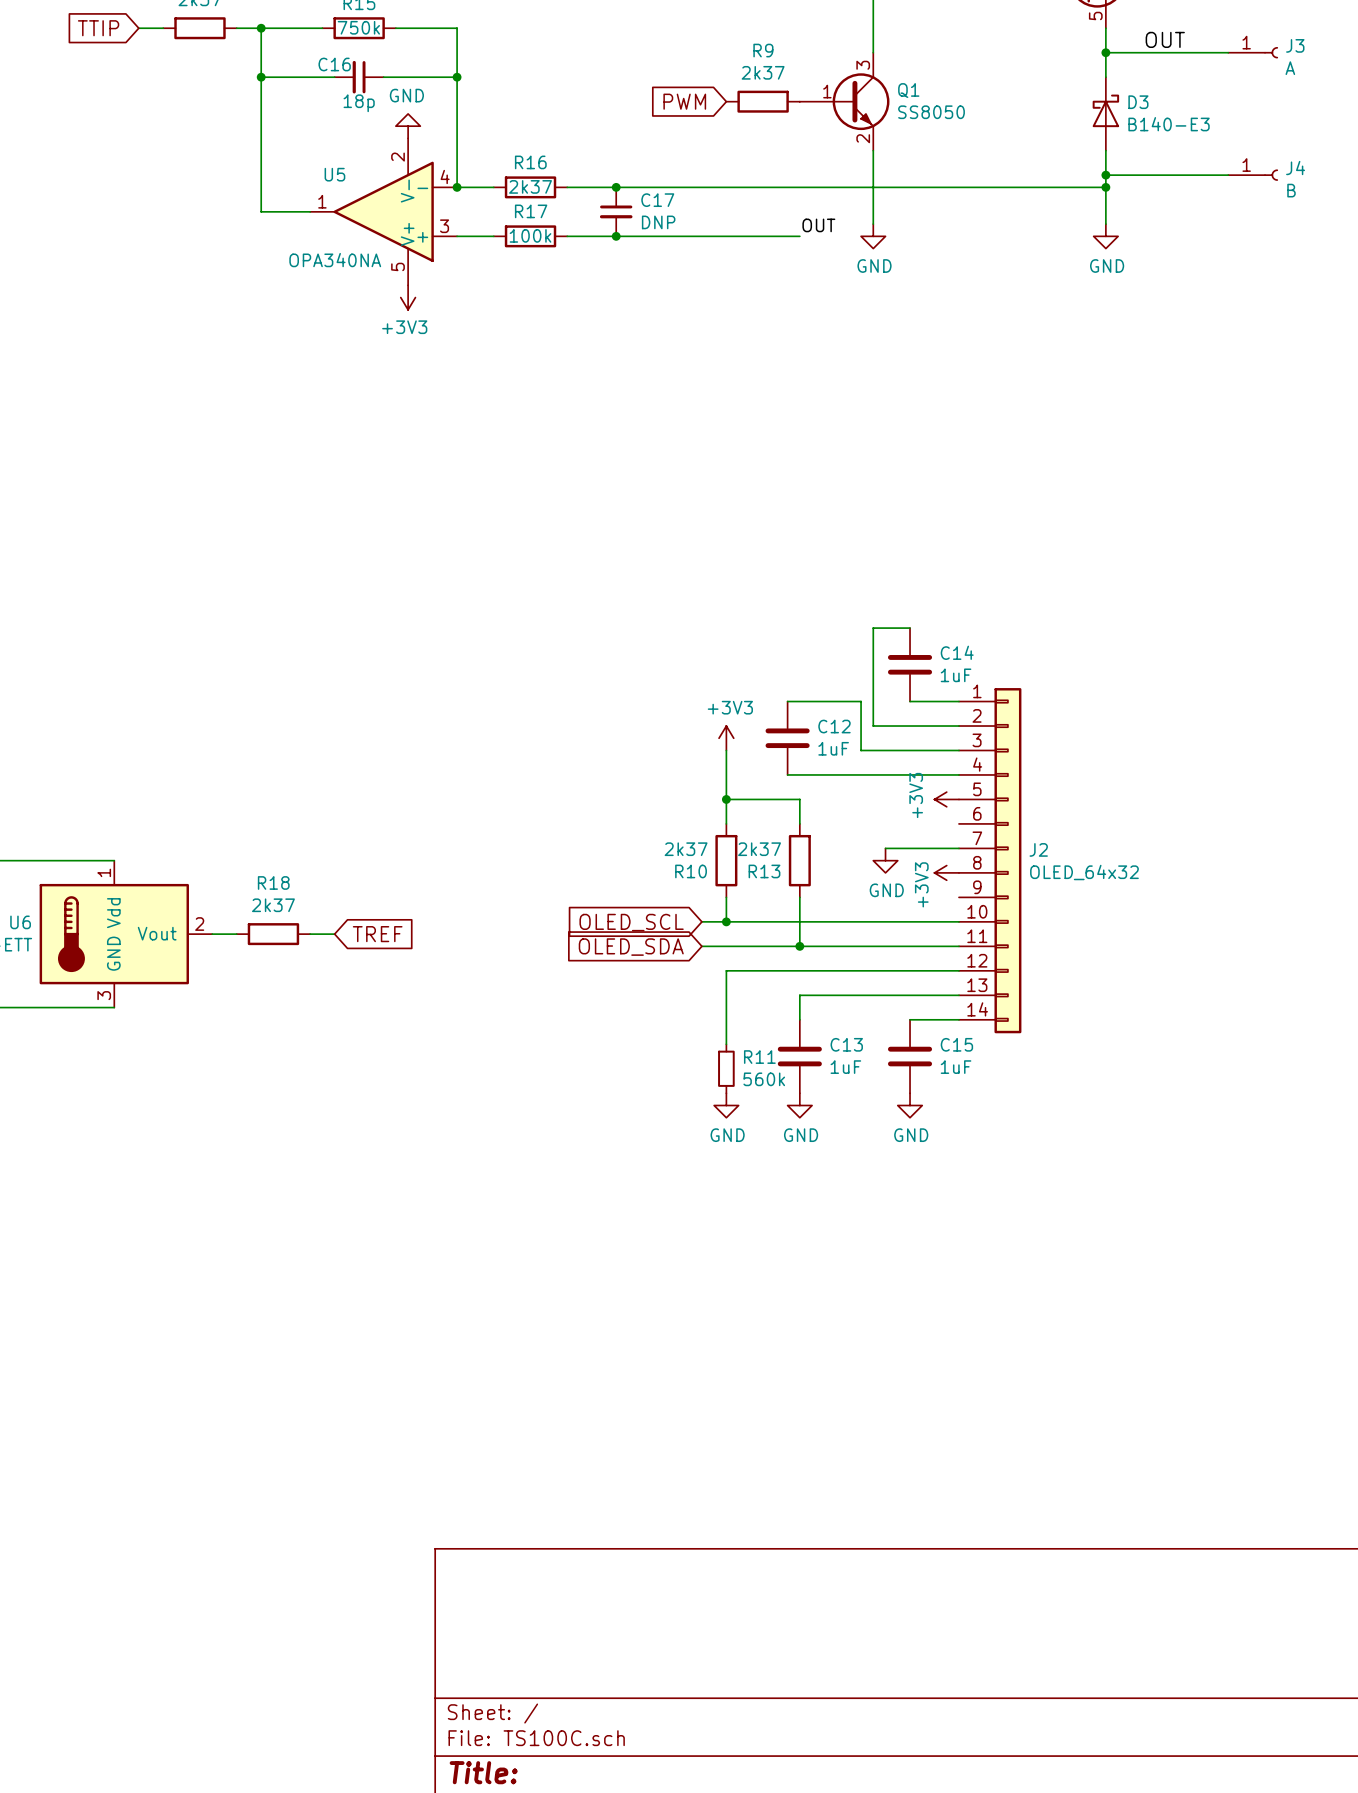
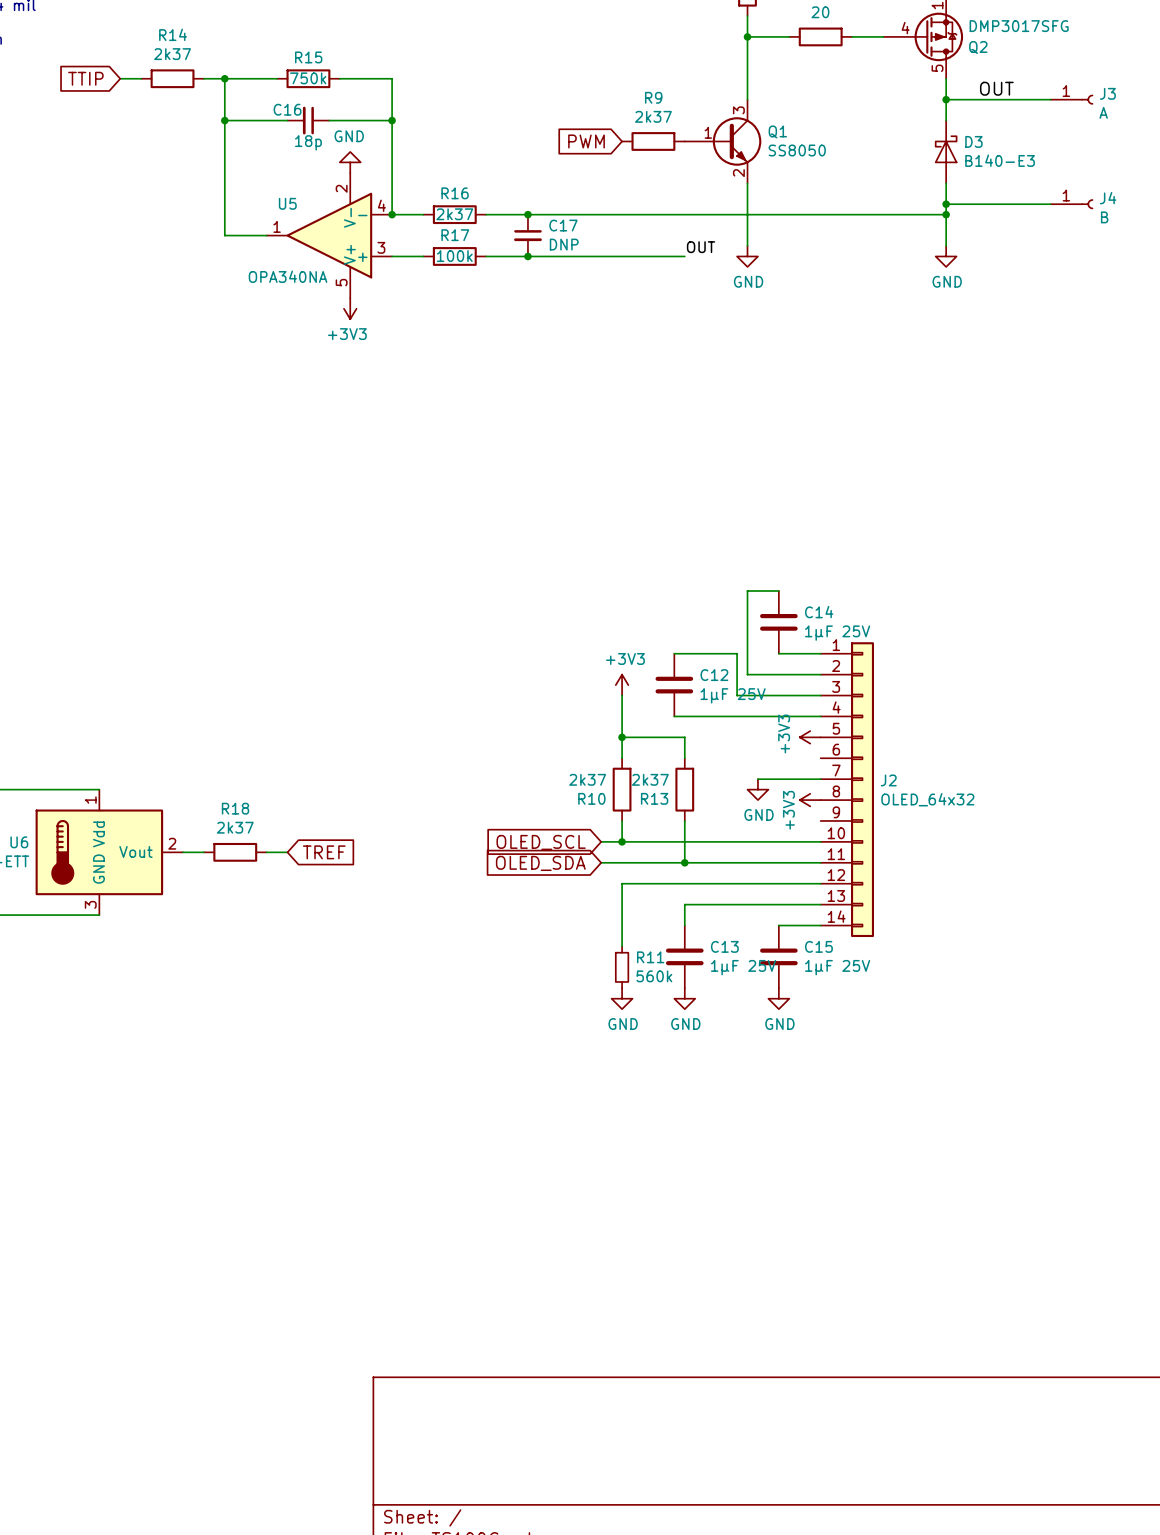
C14 value: 1uF (956, 675) -> 1μF 25V (837, 633)
C12 value: 1uF (833, 748) -> 1μF 25V (733, 695)
C13 value: 1uF (845, 1067) -> 1μF 25V (743, 967)
C15 value: 1uF (956, 1067) -> 1μF 25V (837, 967)

